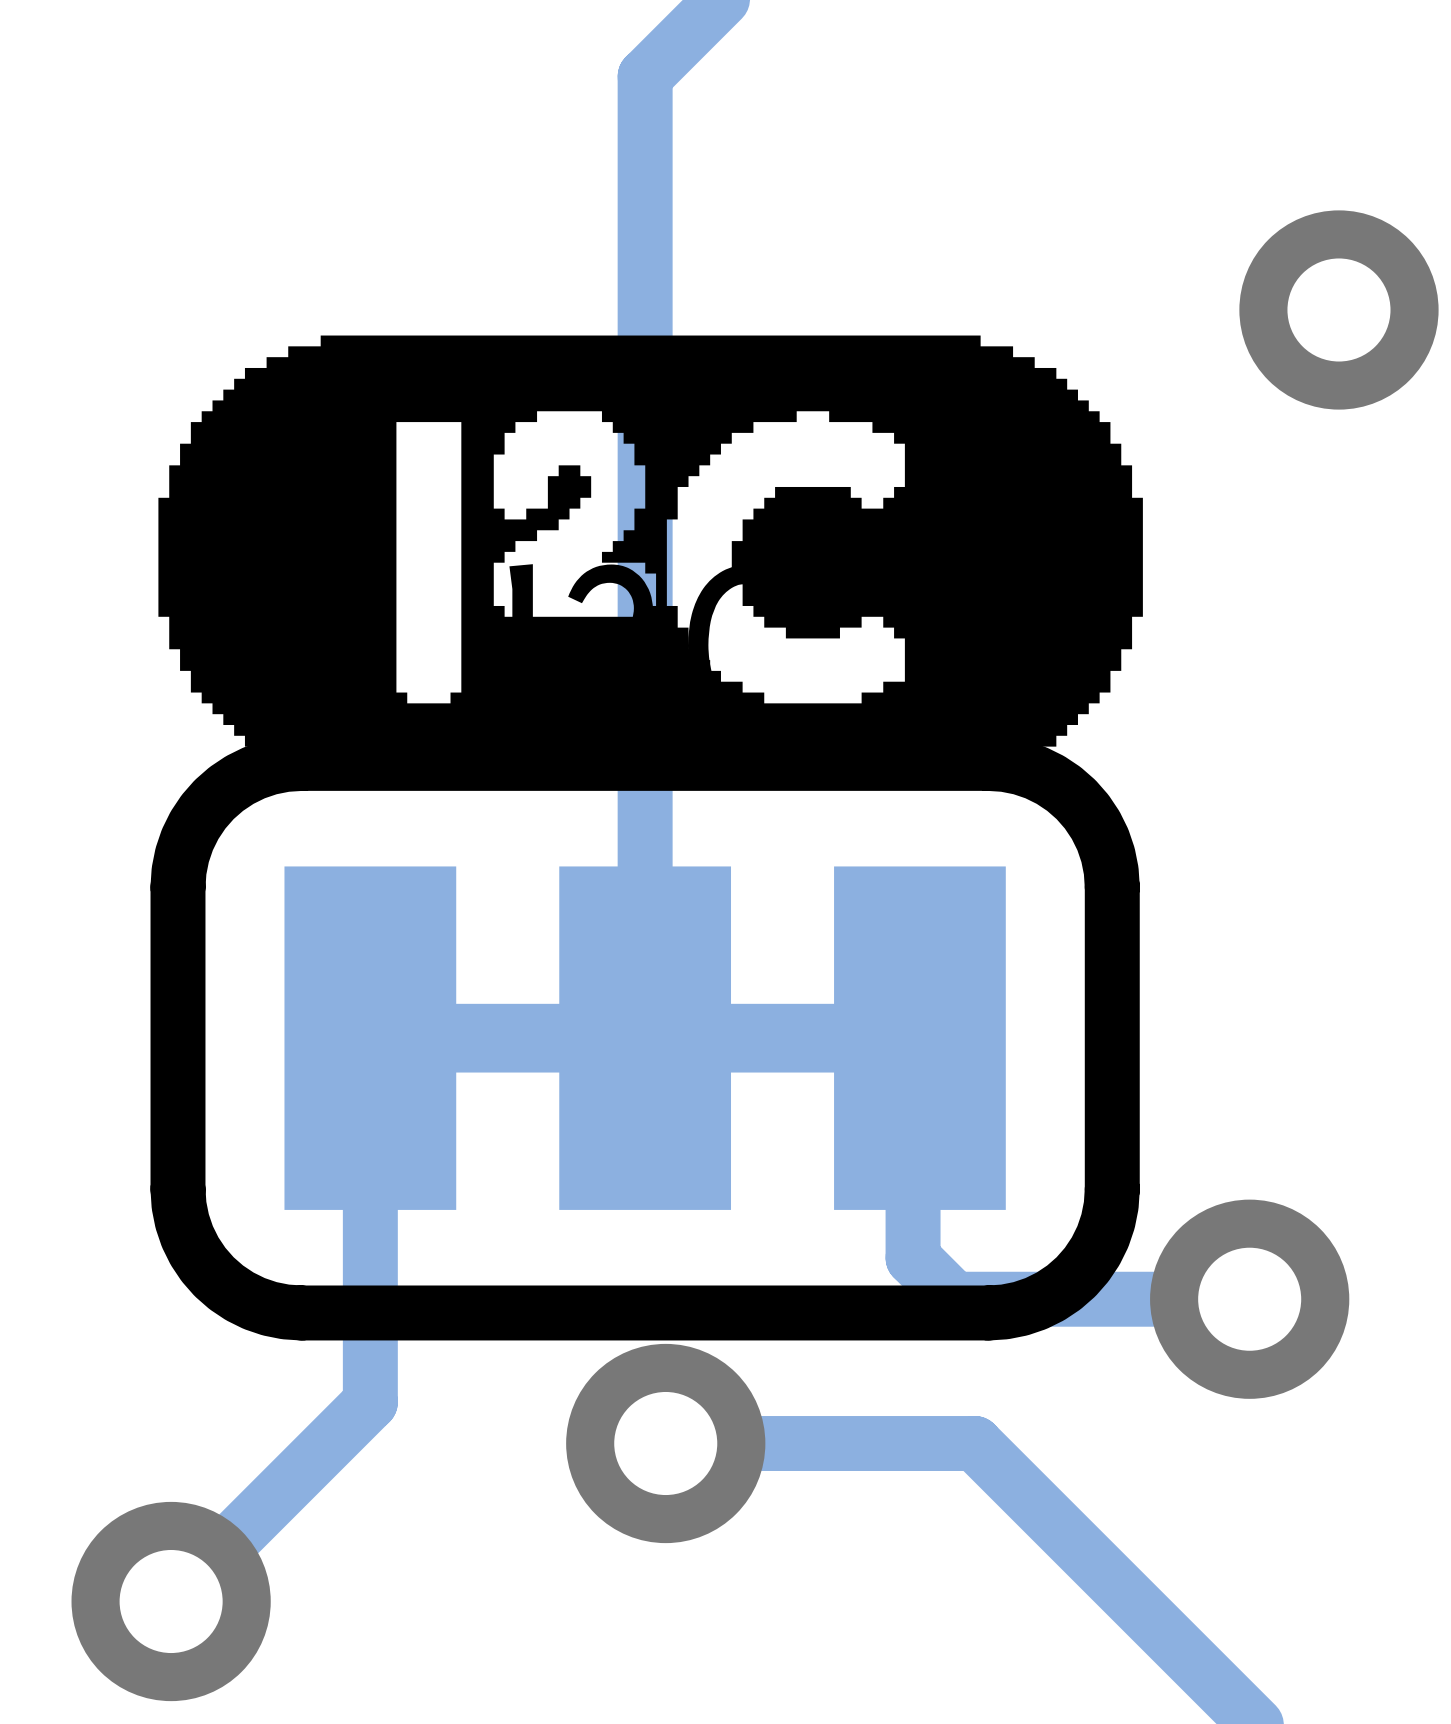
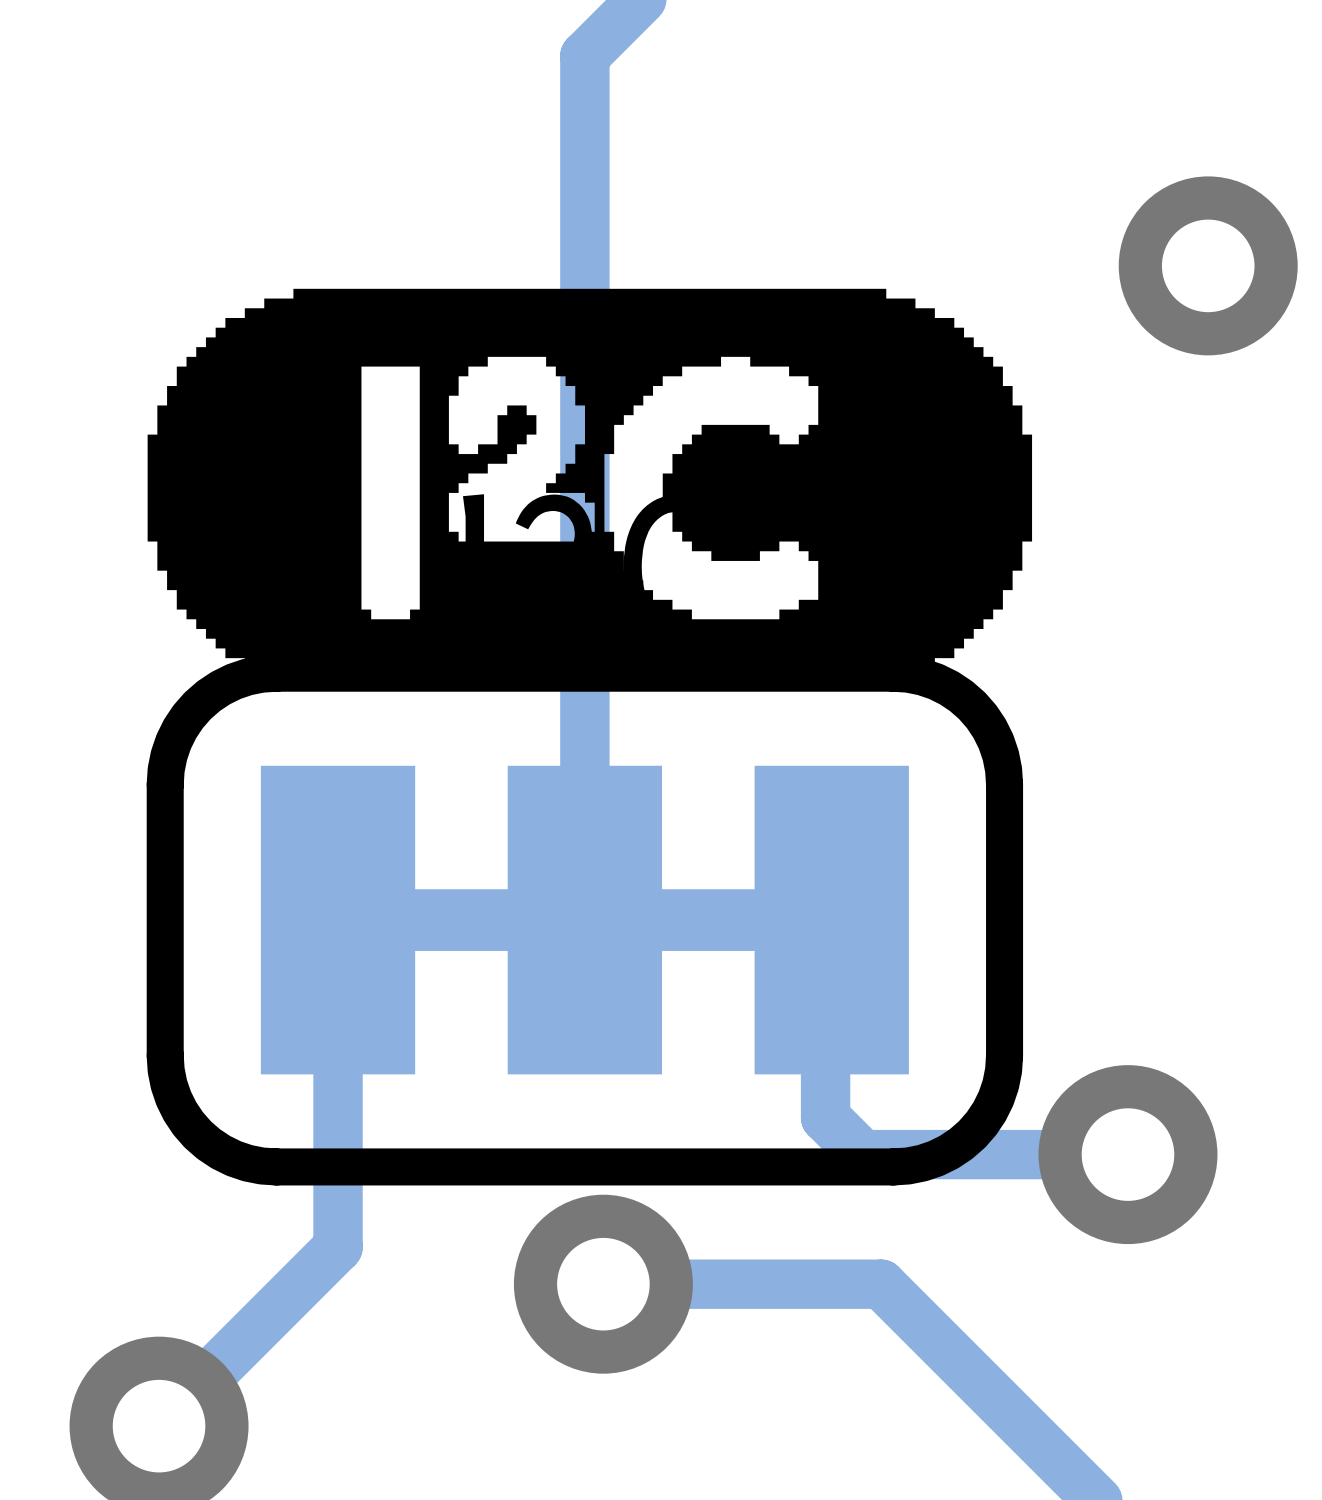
part footprint: [150, 735, 1140, 1341] -> [146, 654, 1024, 1186]

